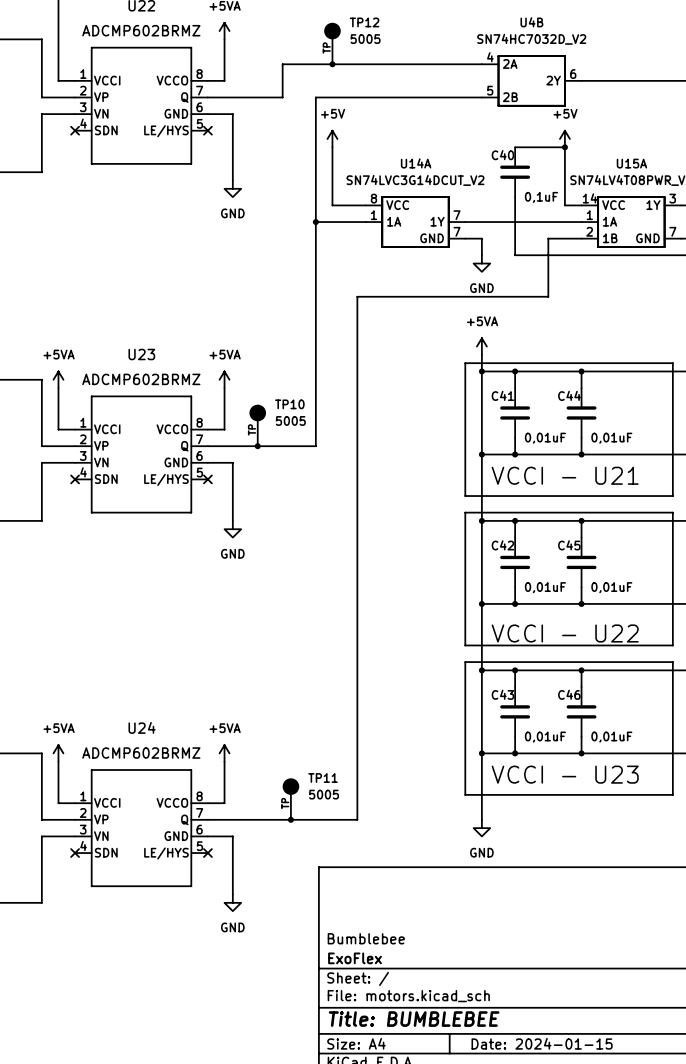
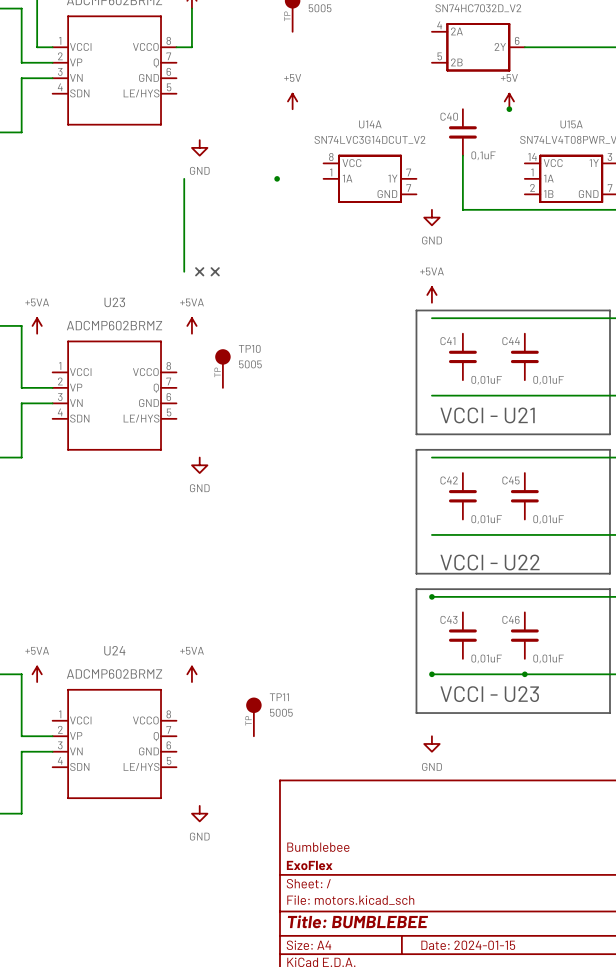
junction: (332, 64) -> none
wire: (481, 64) (282, 64) (282, 97) (207, 97) -> none
wire: (481, 97) (315, 97) (315, 446) (207, 446) -> none
wire: (207, 114) (232, 114) (232, 180) -> none
no-connect mark: (75, 130) -> none
no-connect mark: (207, 130) -> none
wire: (332, 147) (332, 205) (365, 205) -> none
wire: (515, 147) (564, 147) (564, 205) (581, 205) -> none
wire: none -> (184, 178) (184, 271)
wire: (315, 222) (365, 222) -> none
wire: (465, 222) (581, 222) -> none
wire: (465, 238) (481, 238) (481, 255) -> none
wire: (581, 238) (548, 238) (548, 296) (357, 296) (357, 819) (207, 819) -> none
no-connect mark: none -> (199, 271)
no-connect mark: none -> (215, 271)
wire: (481, 354) (481, 819) -> none
junction: (481, 371) -> none
wire: (515, 371) (515, 388) -> none
junction: (515, 371) -> none
wire: (581, 371) (581, 388) -> none
junction: (581, 371) -> none
wire: (58, 388) (58, 429) (75, 429) -> none
wire: (224, 388) (224, 429) (207, 429) -> none
wire: (515, 437) (515, 454) -> none
wire: (581, 437) (581, 454) -> none
junction: (257, 446) -> none
junction: (481, 454) -> none
junction: (515, 454) -> none
junction: (581, 454) -> none
wire: (207, 462) (232, 462) (232, 520) -> none
no-connect mark: (75, 479) -> none
no-connect mark: (207, 479) -> none
junction: (481, 520) -> none
wire: (515, 520) (515, 537) -> none
junction: (515, 520) -> none
wire: (581, 520) (581, 537) -> none
junction: (581, 520) -> none
wire: (515, 587) (515, 603) -> none
wire: (581, 587) (581, 603) -> none
junction: (481, 603) -> none
junction: (515, 603) -> none
junction: (581, 603) -> none
wire: (515, 670) (515, 686) -> none
junction: (515, 670) -> none
wire: (581, 670) (581, 686) -> none
junction: (581, 670) -> none
wire: (515, 736) (515, 753) -> none
wire: (581, 736) (581, 753) -> none
junction: (515, 753) -> none
wire: (58, 761) (58, 803) (75, 803) -> none
wire: (224, 761) (224, 803) (207, 803) -> none
junction: (290, 819) -> none
wire: (207, 836) (232, 836) (232, 894) -> none
no-connect mark: (75, 853) -> none
no-connect mark: (207, 853) -> none

